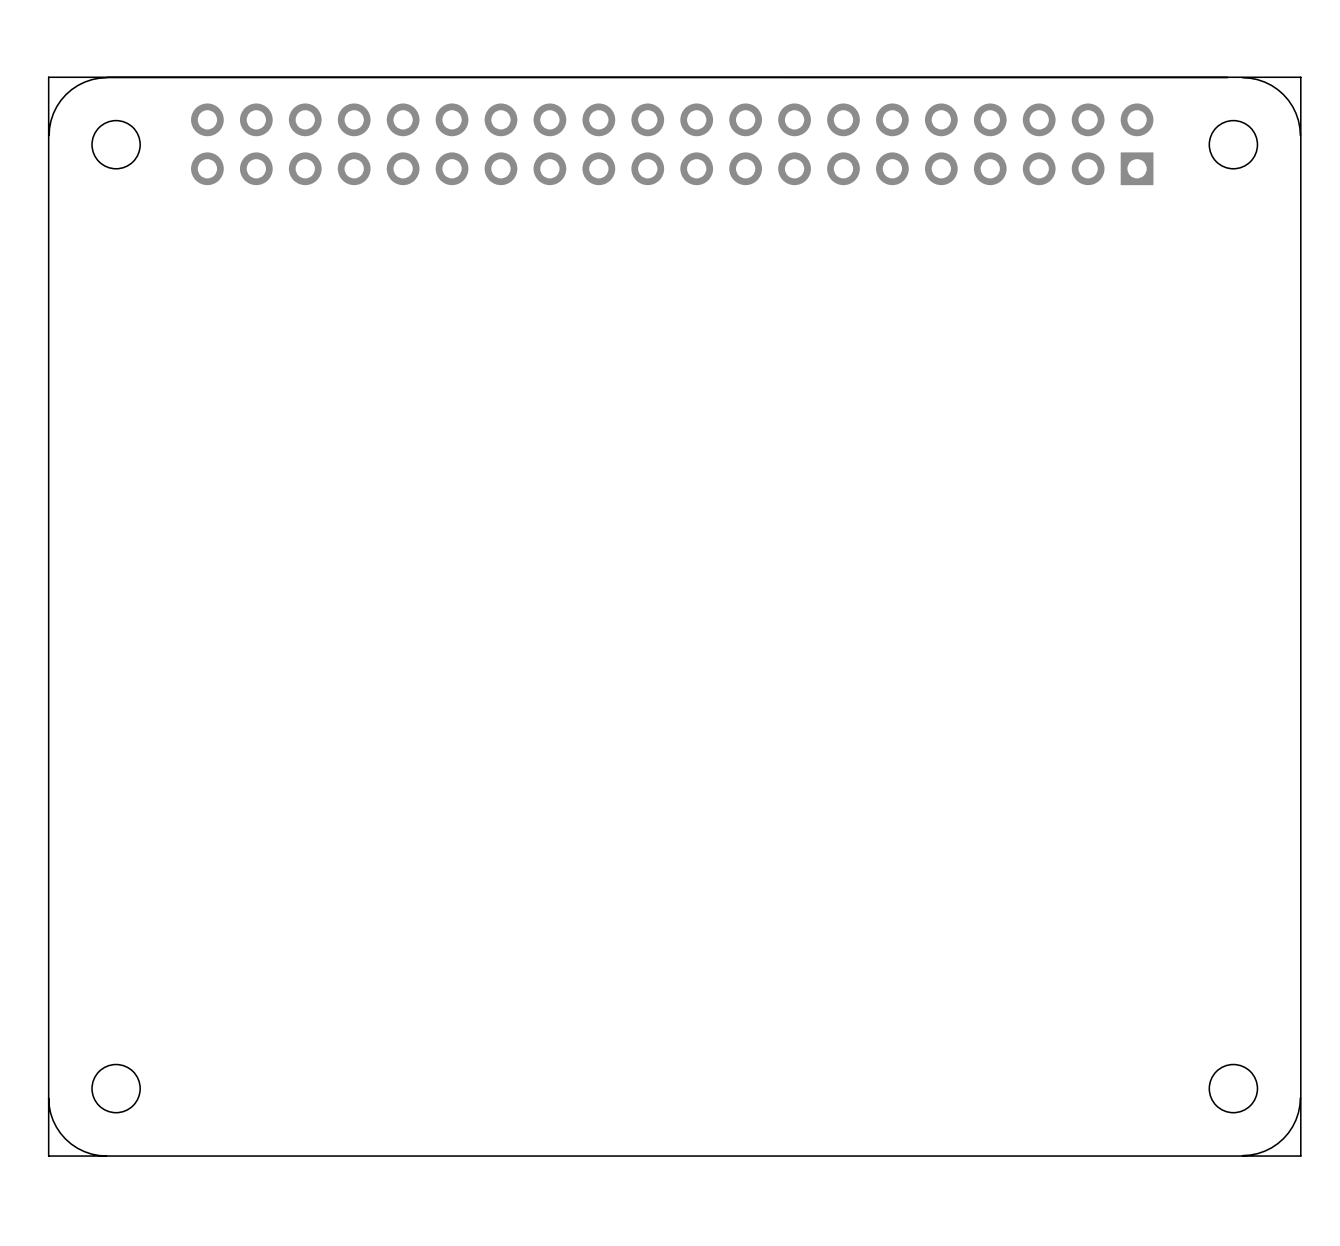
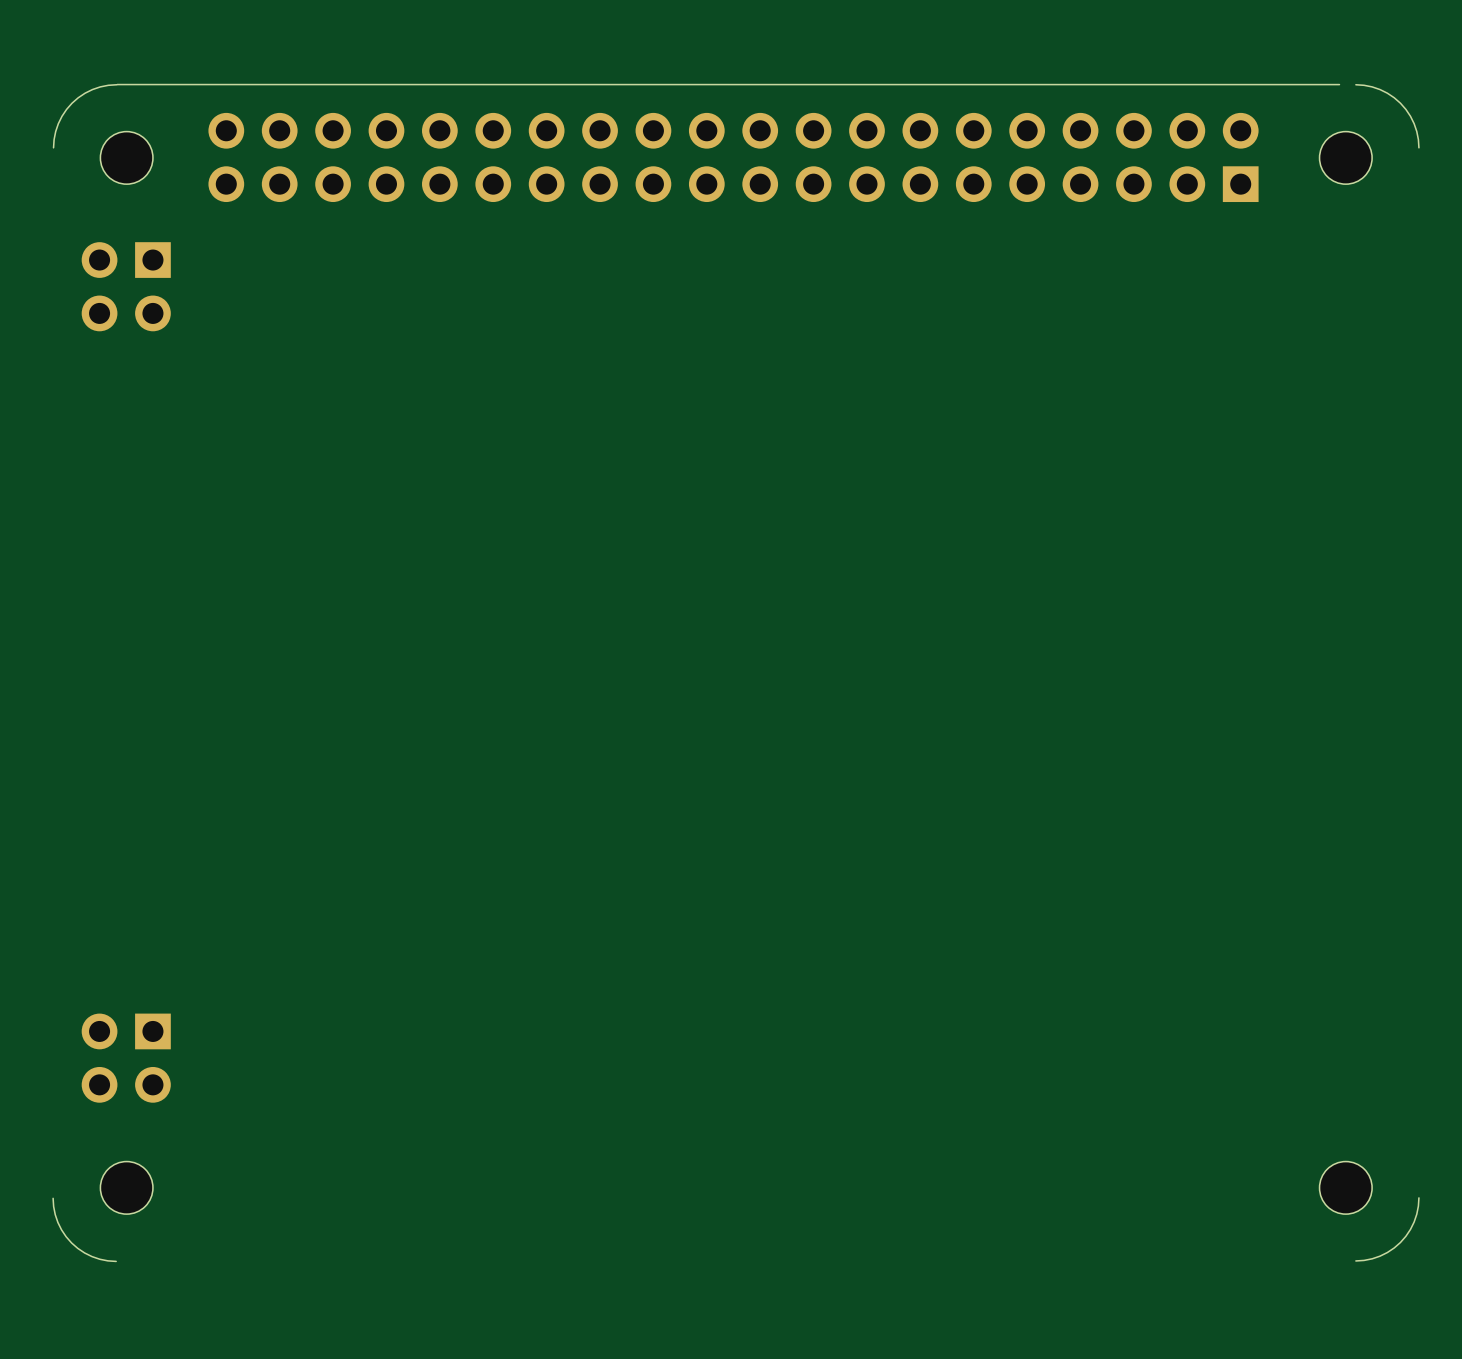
board edge: (1300, 77) (48, 77) (48, 1156) (1300, 1156) (1300, 77) -> none
part: none -> (126, 286)
part: none -> (126, 1058)

